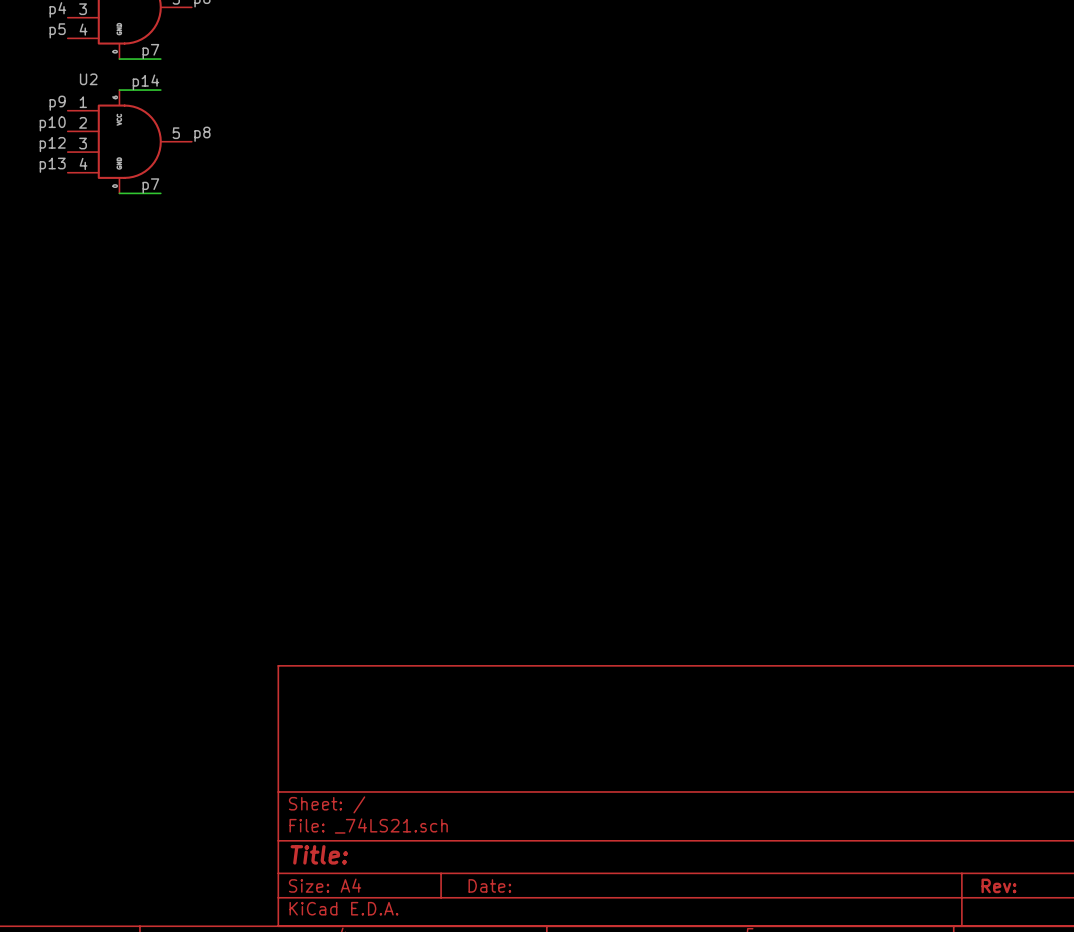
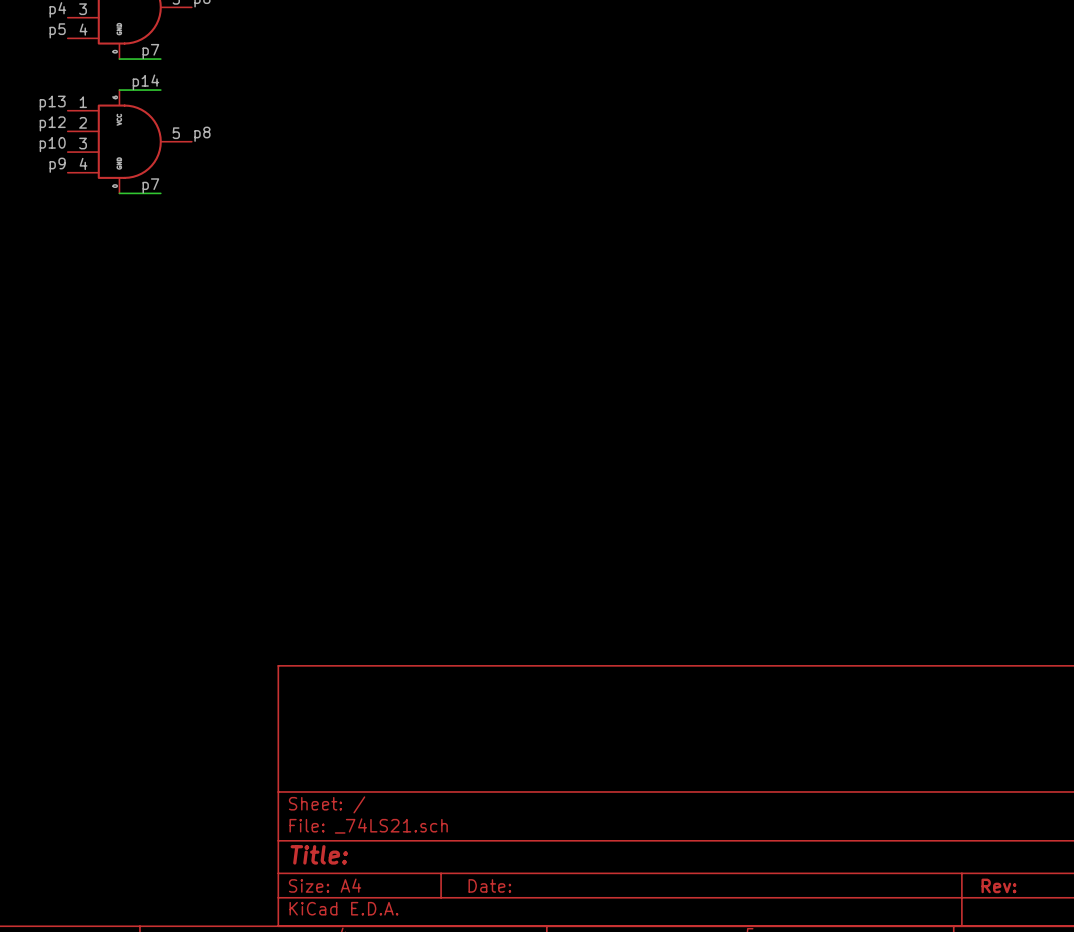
U2 name: U2 (88, 79) -> none
label: p9 (57, 103) -> p13 (52, 103)
label: p10 (52, 123) -> p12 (52, 123)
label: p12 (52, 144) -> p10 (52, 144)
label: p13 (52, 165) -> p9 (57, 165)

